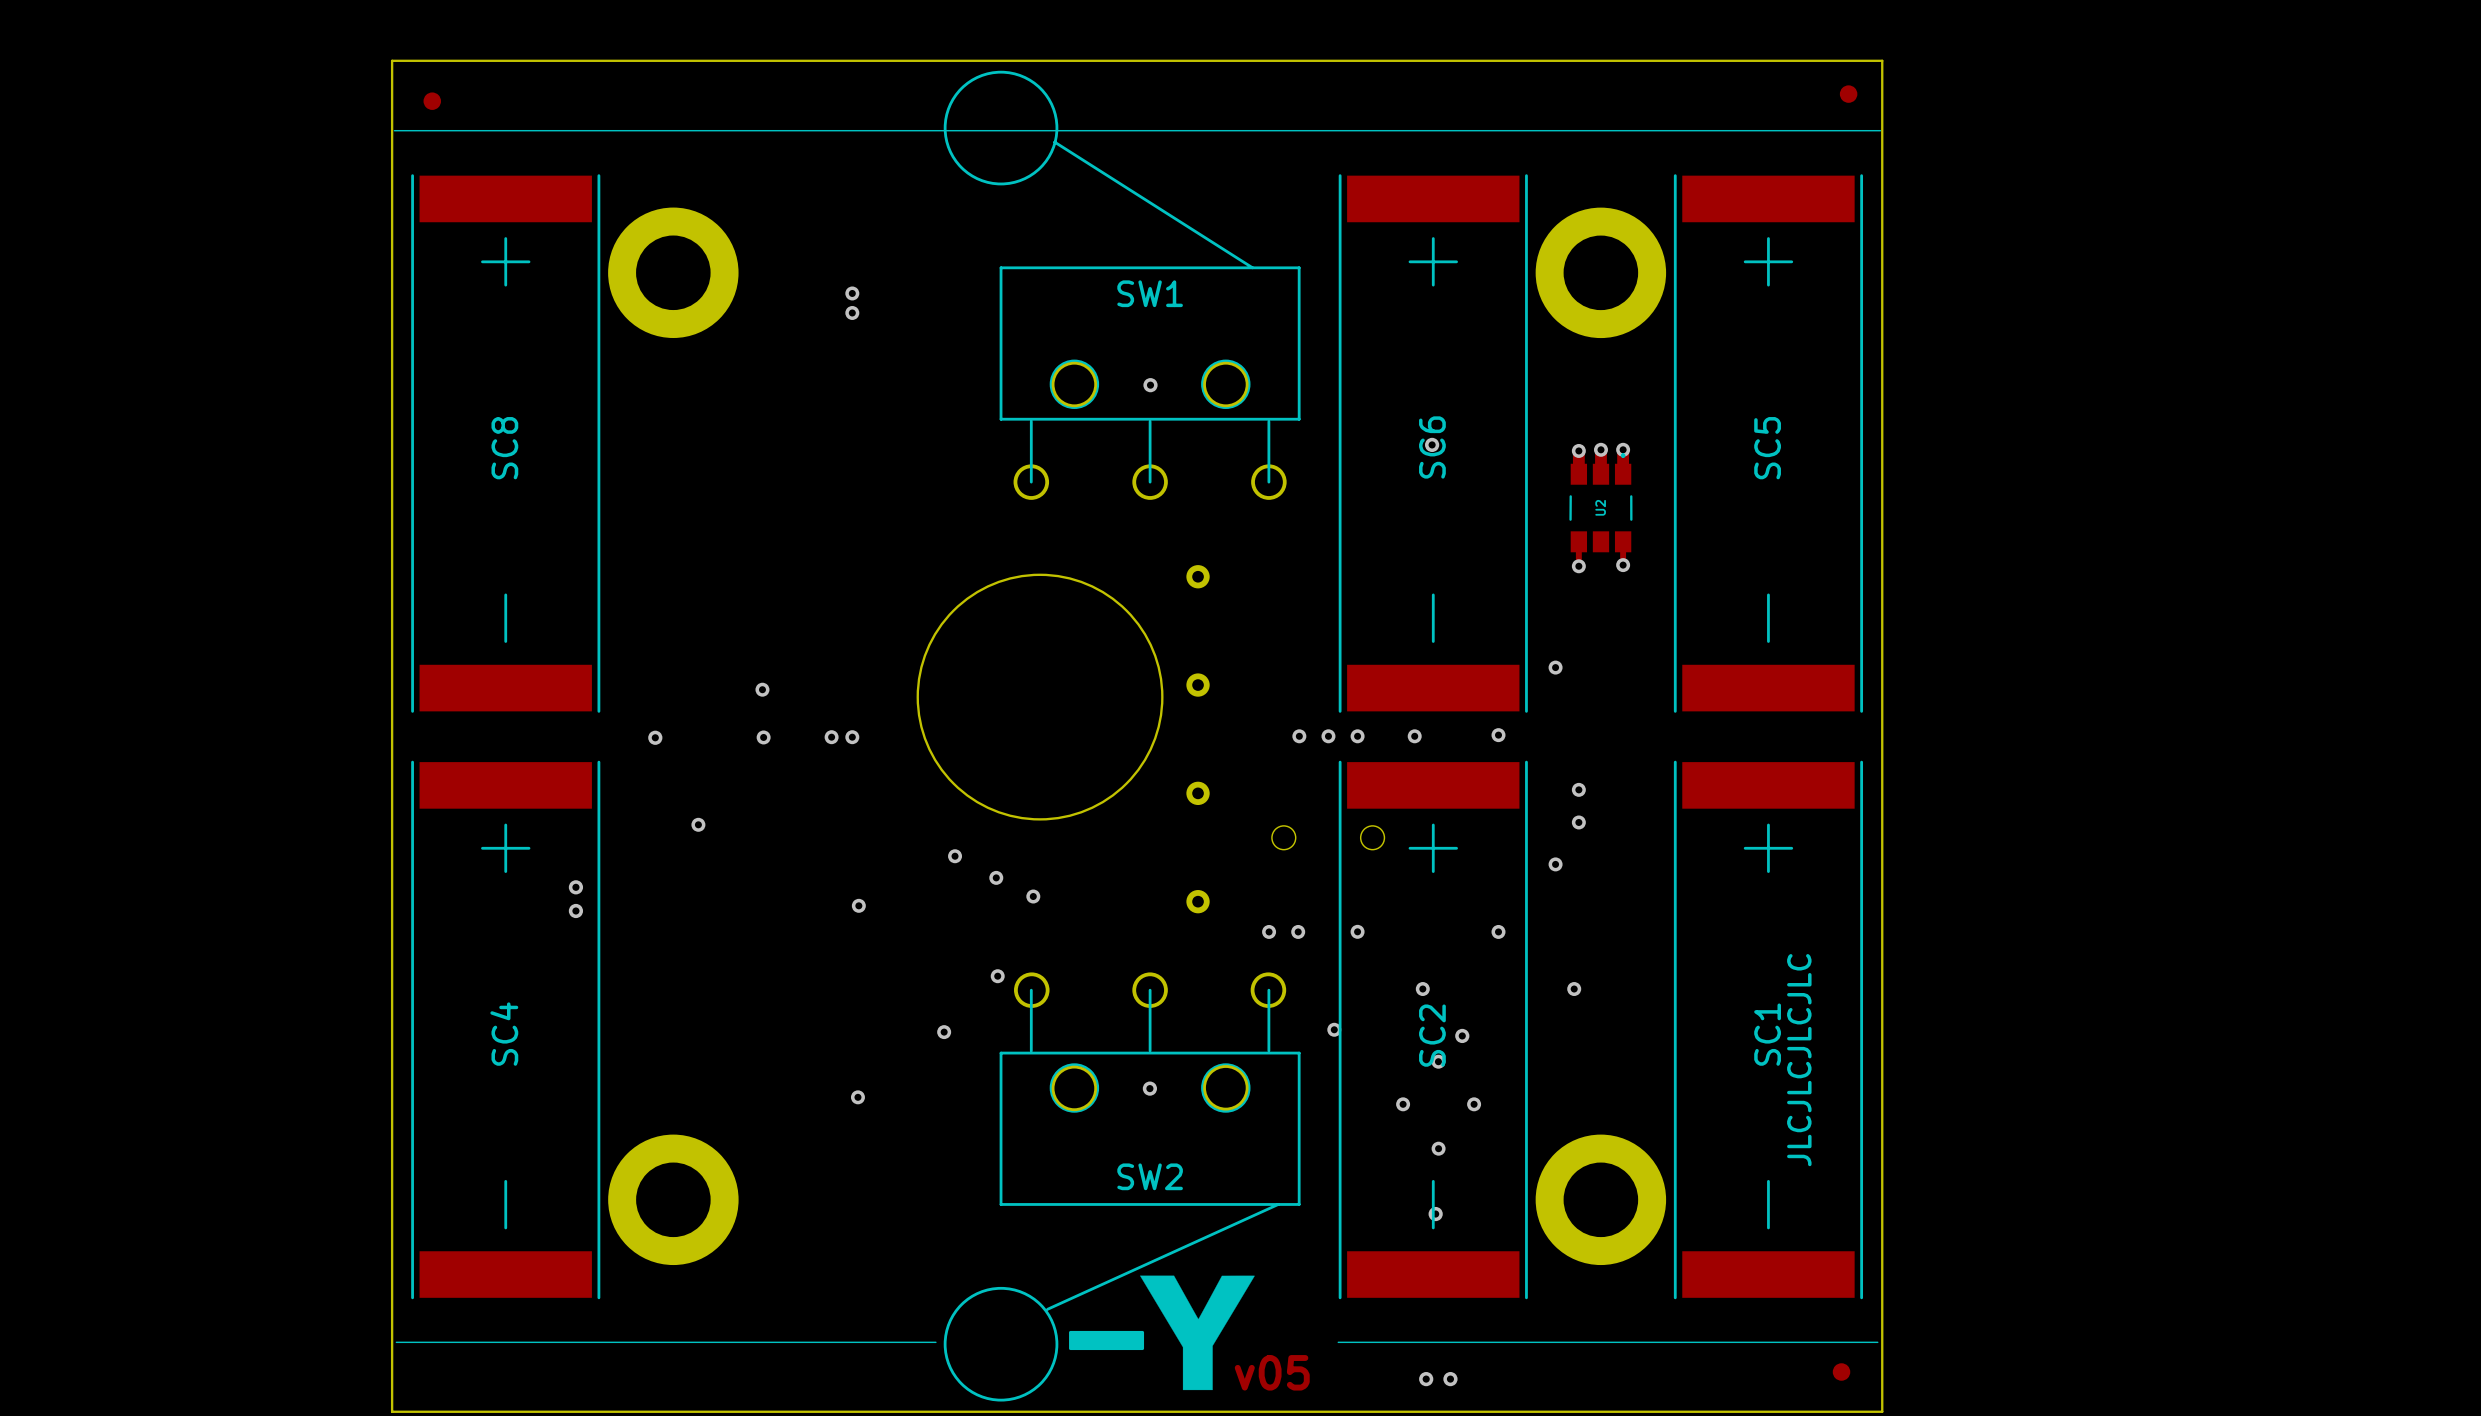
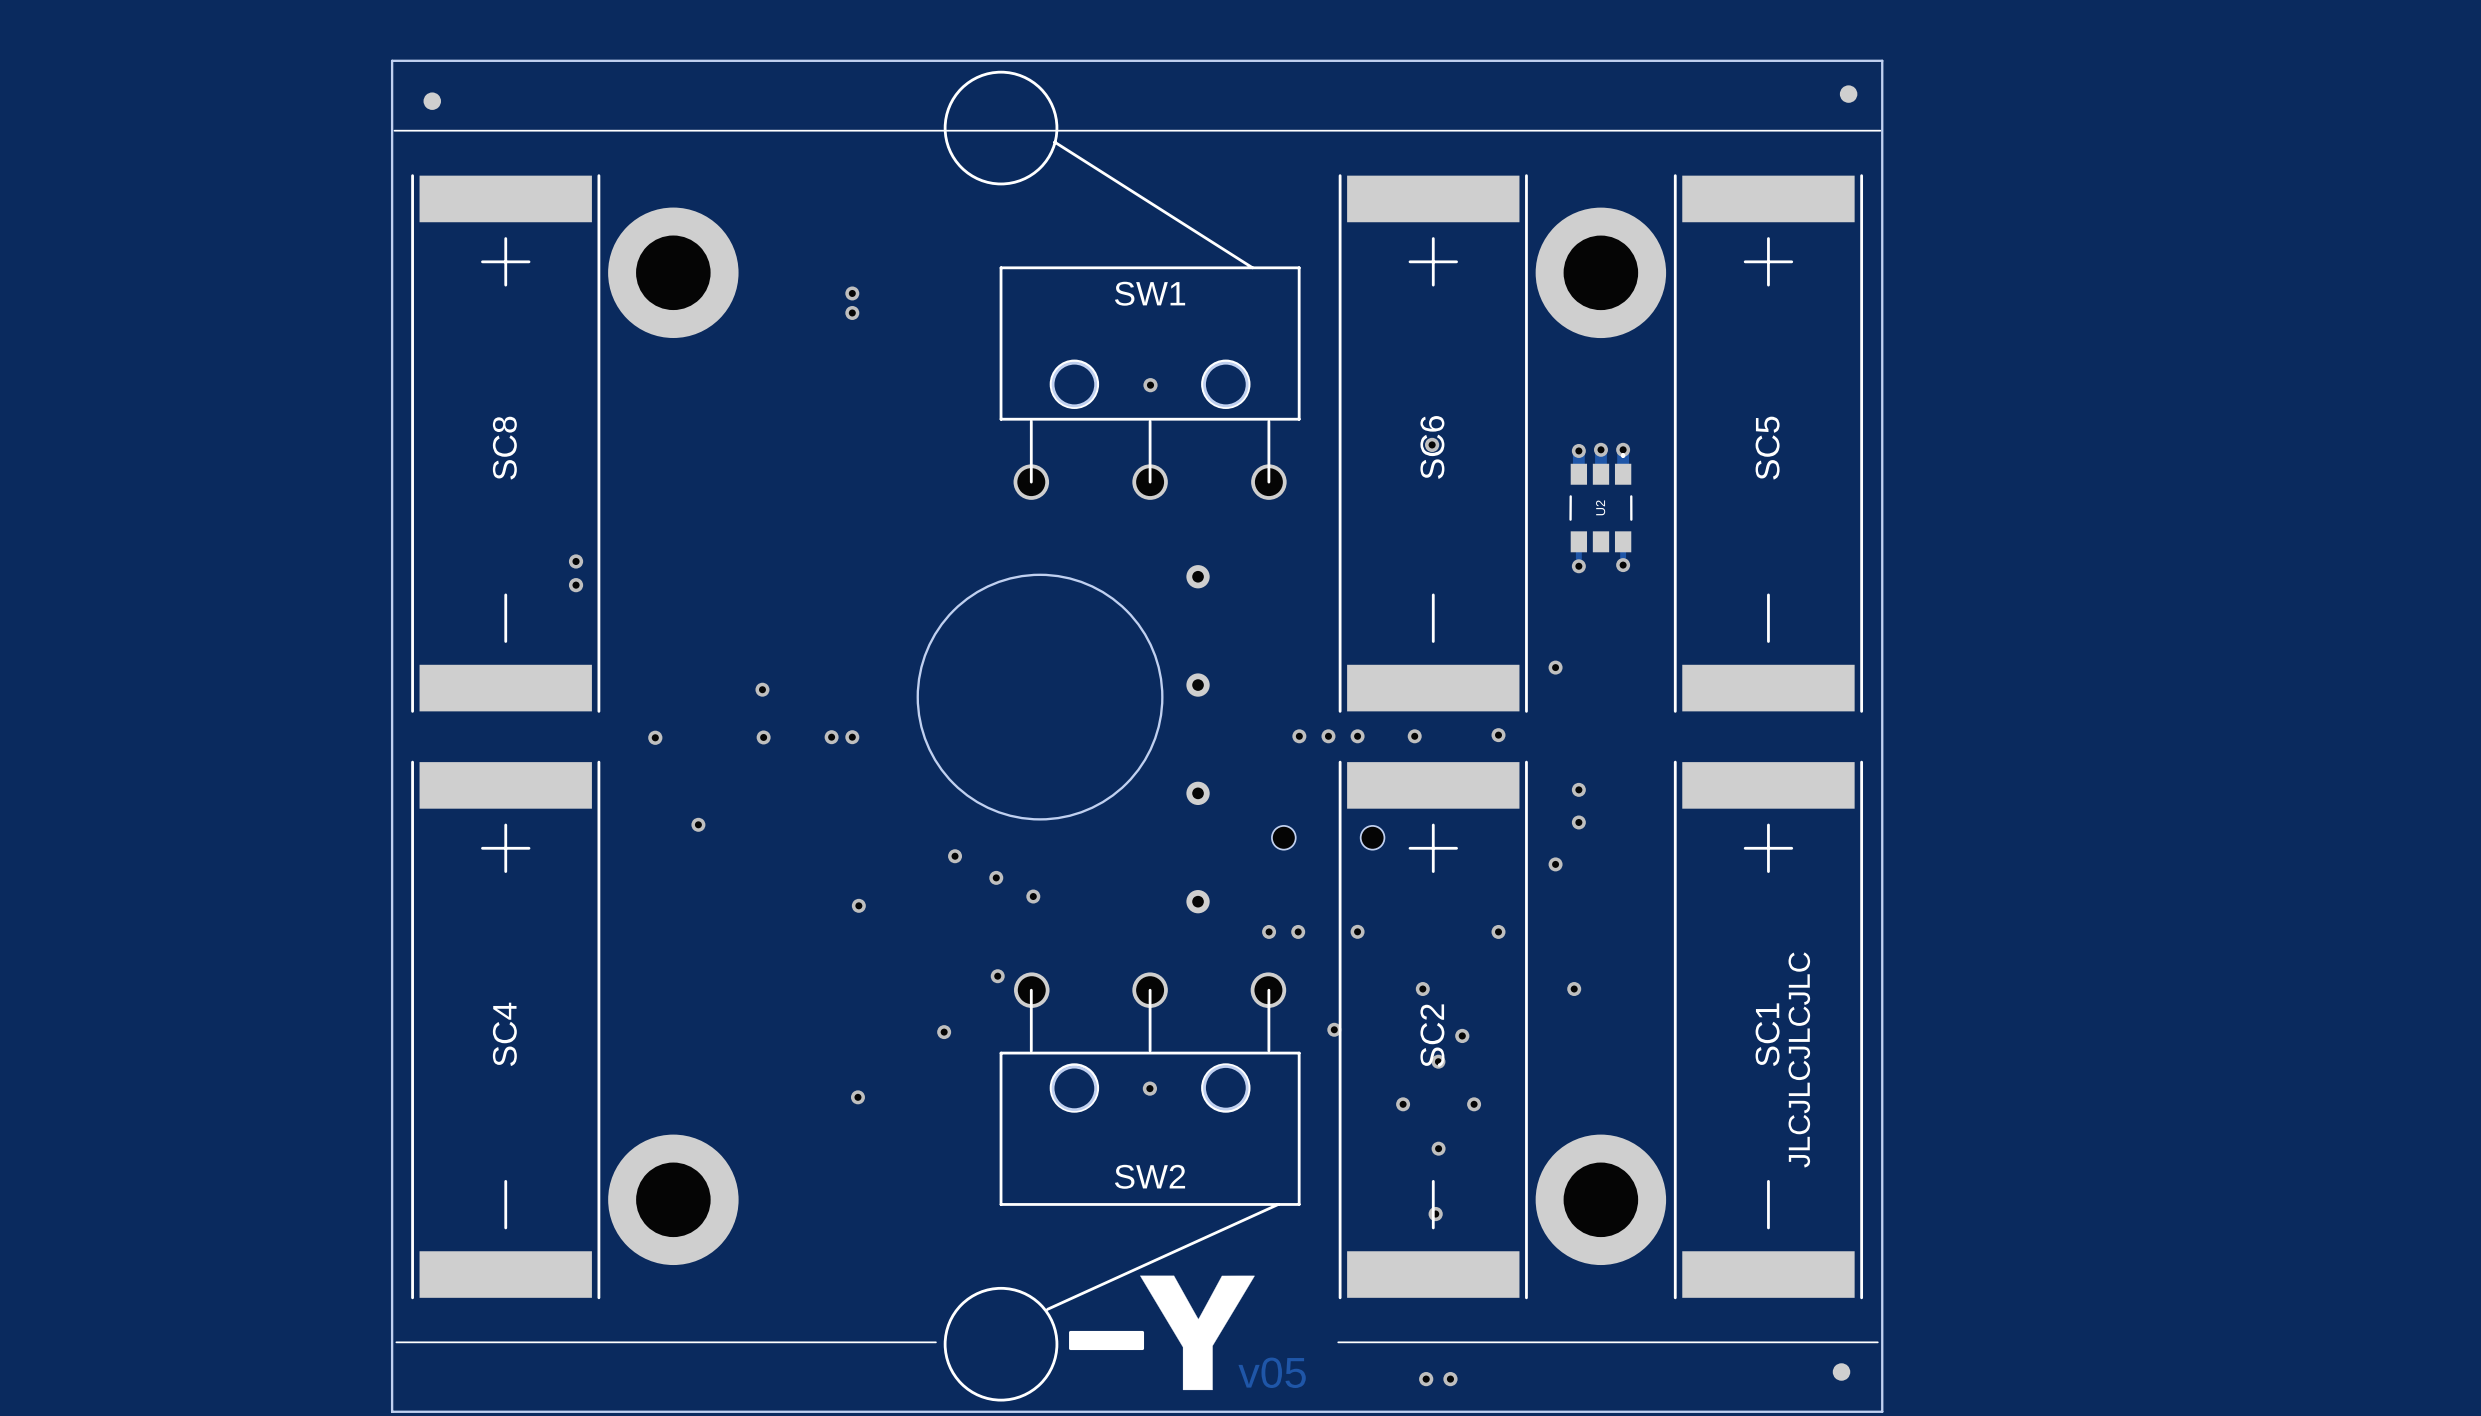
via: none -> (576, 561)
via: none -> (576, 585)
via: (575, 887) -> none
via: (575, 910) -> none

